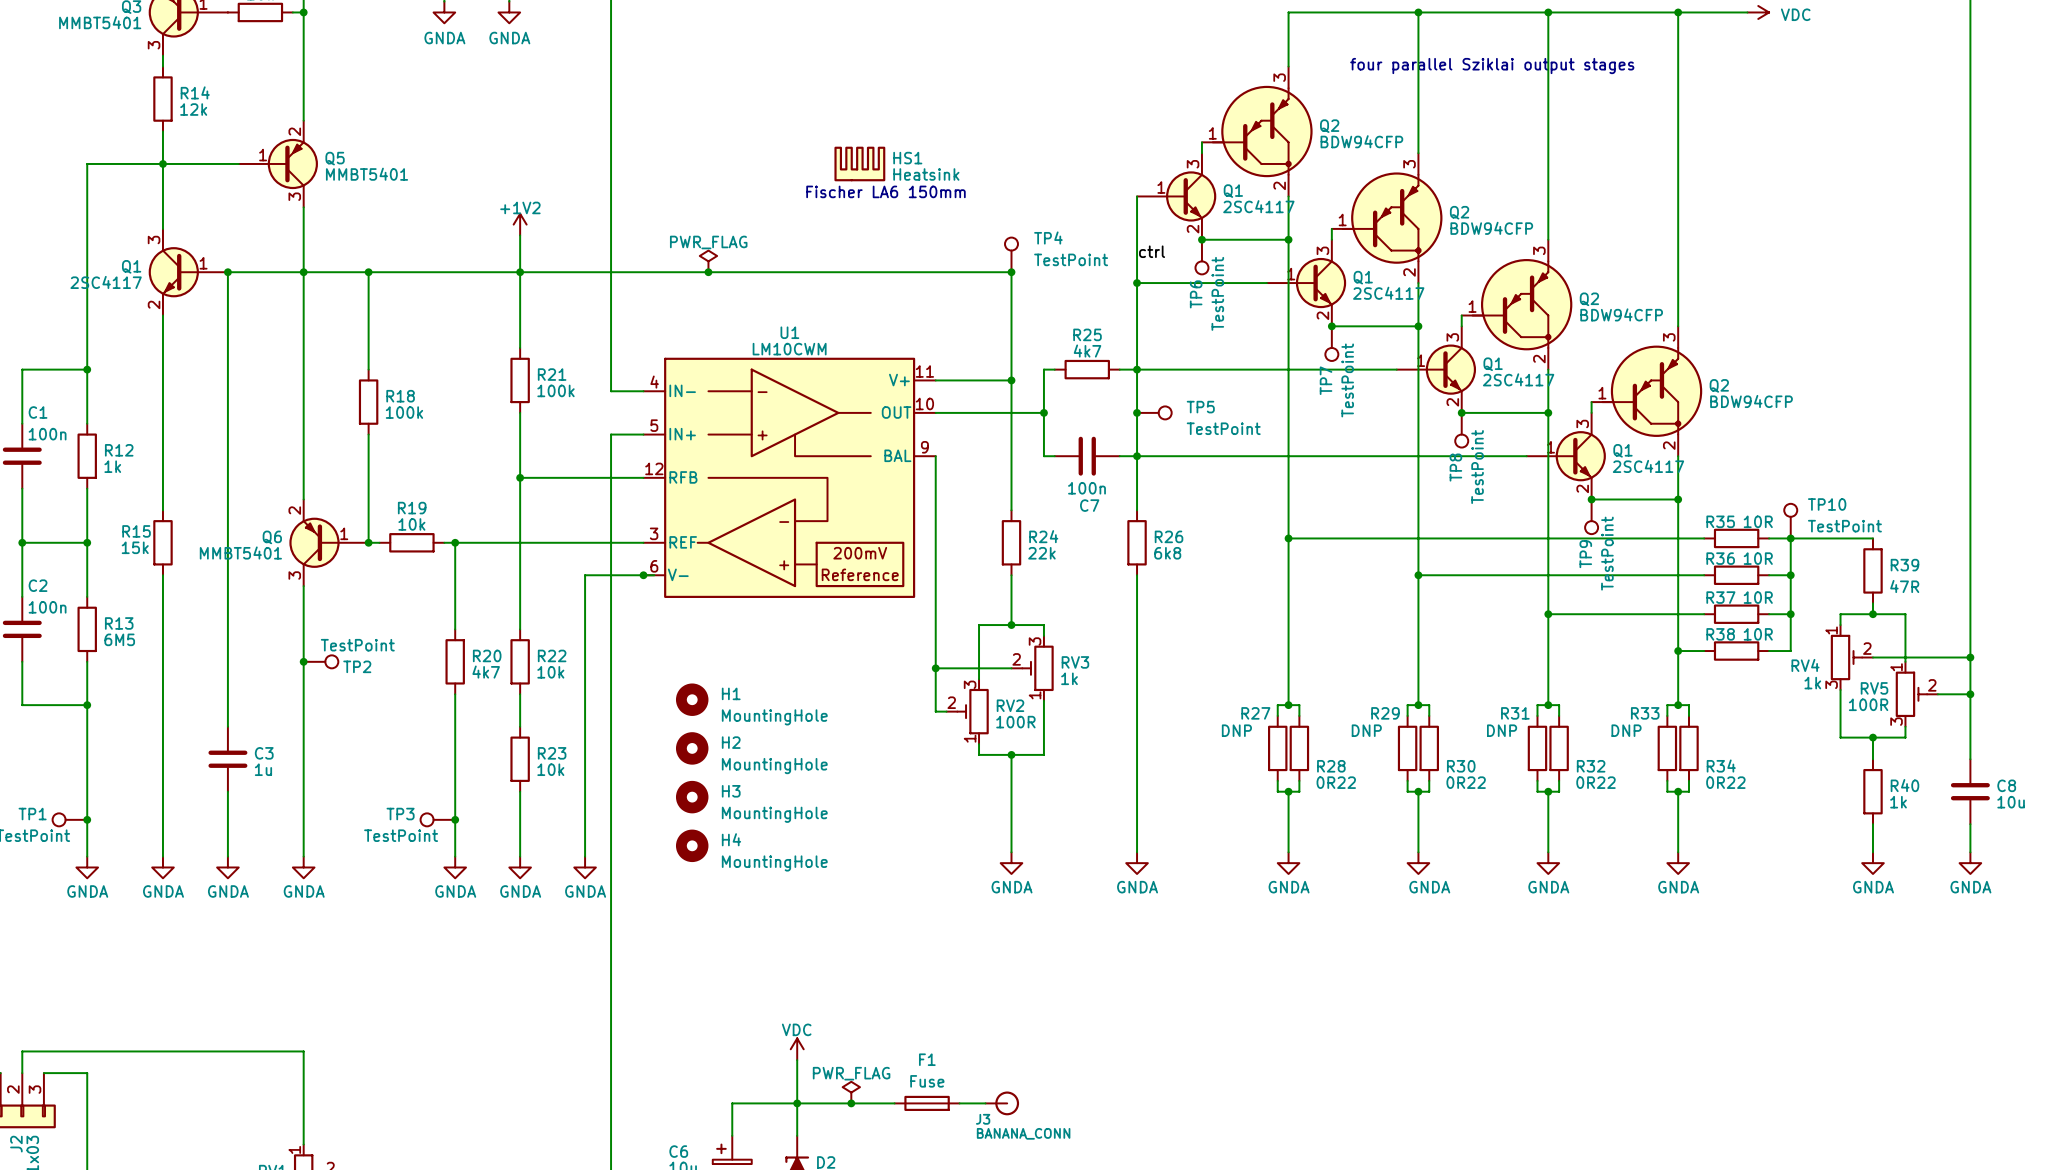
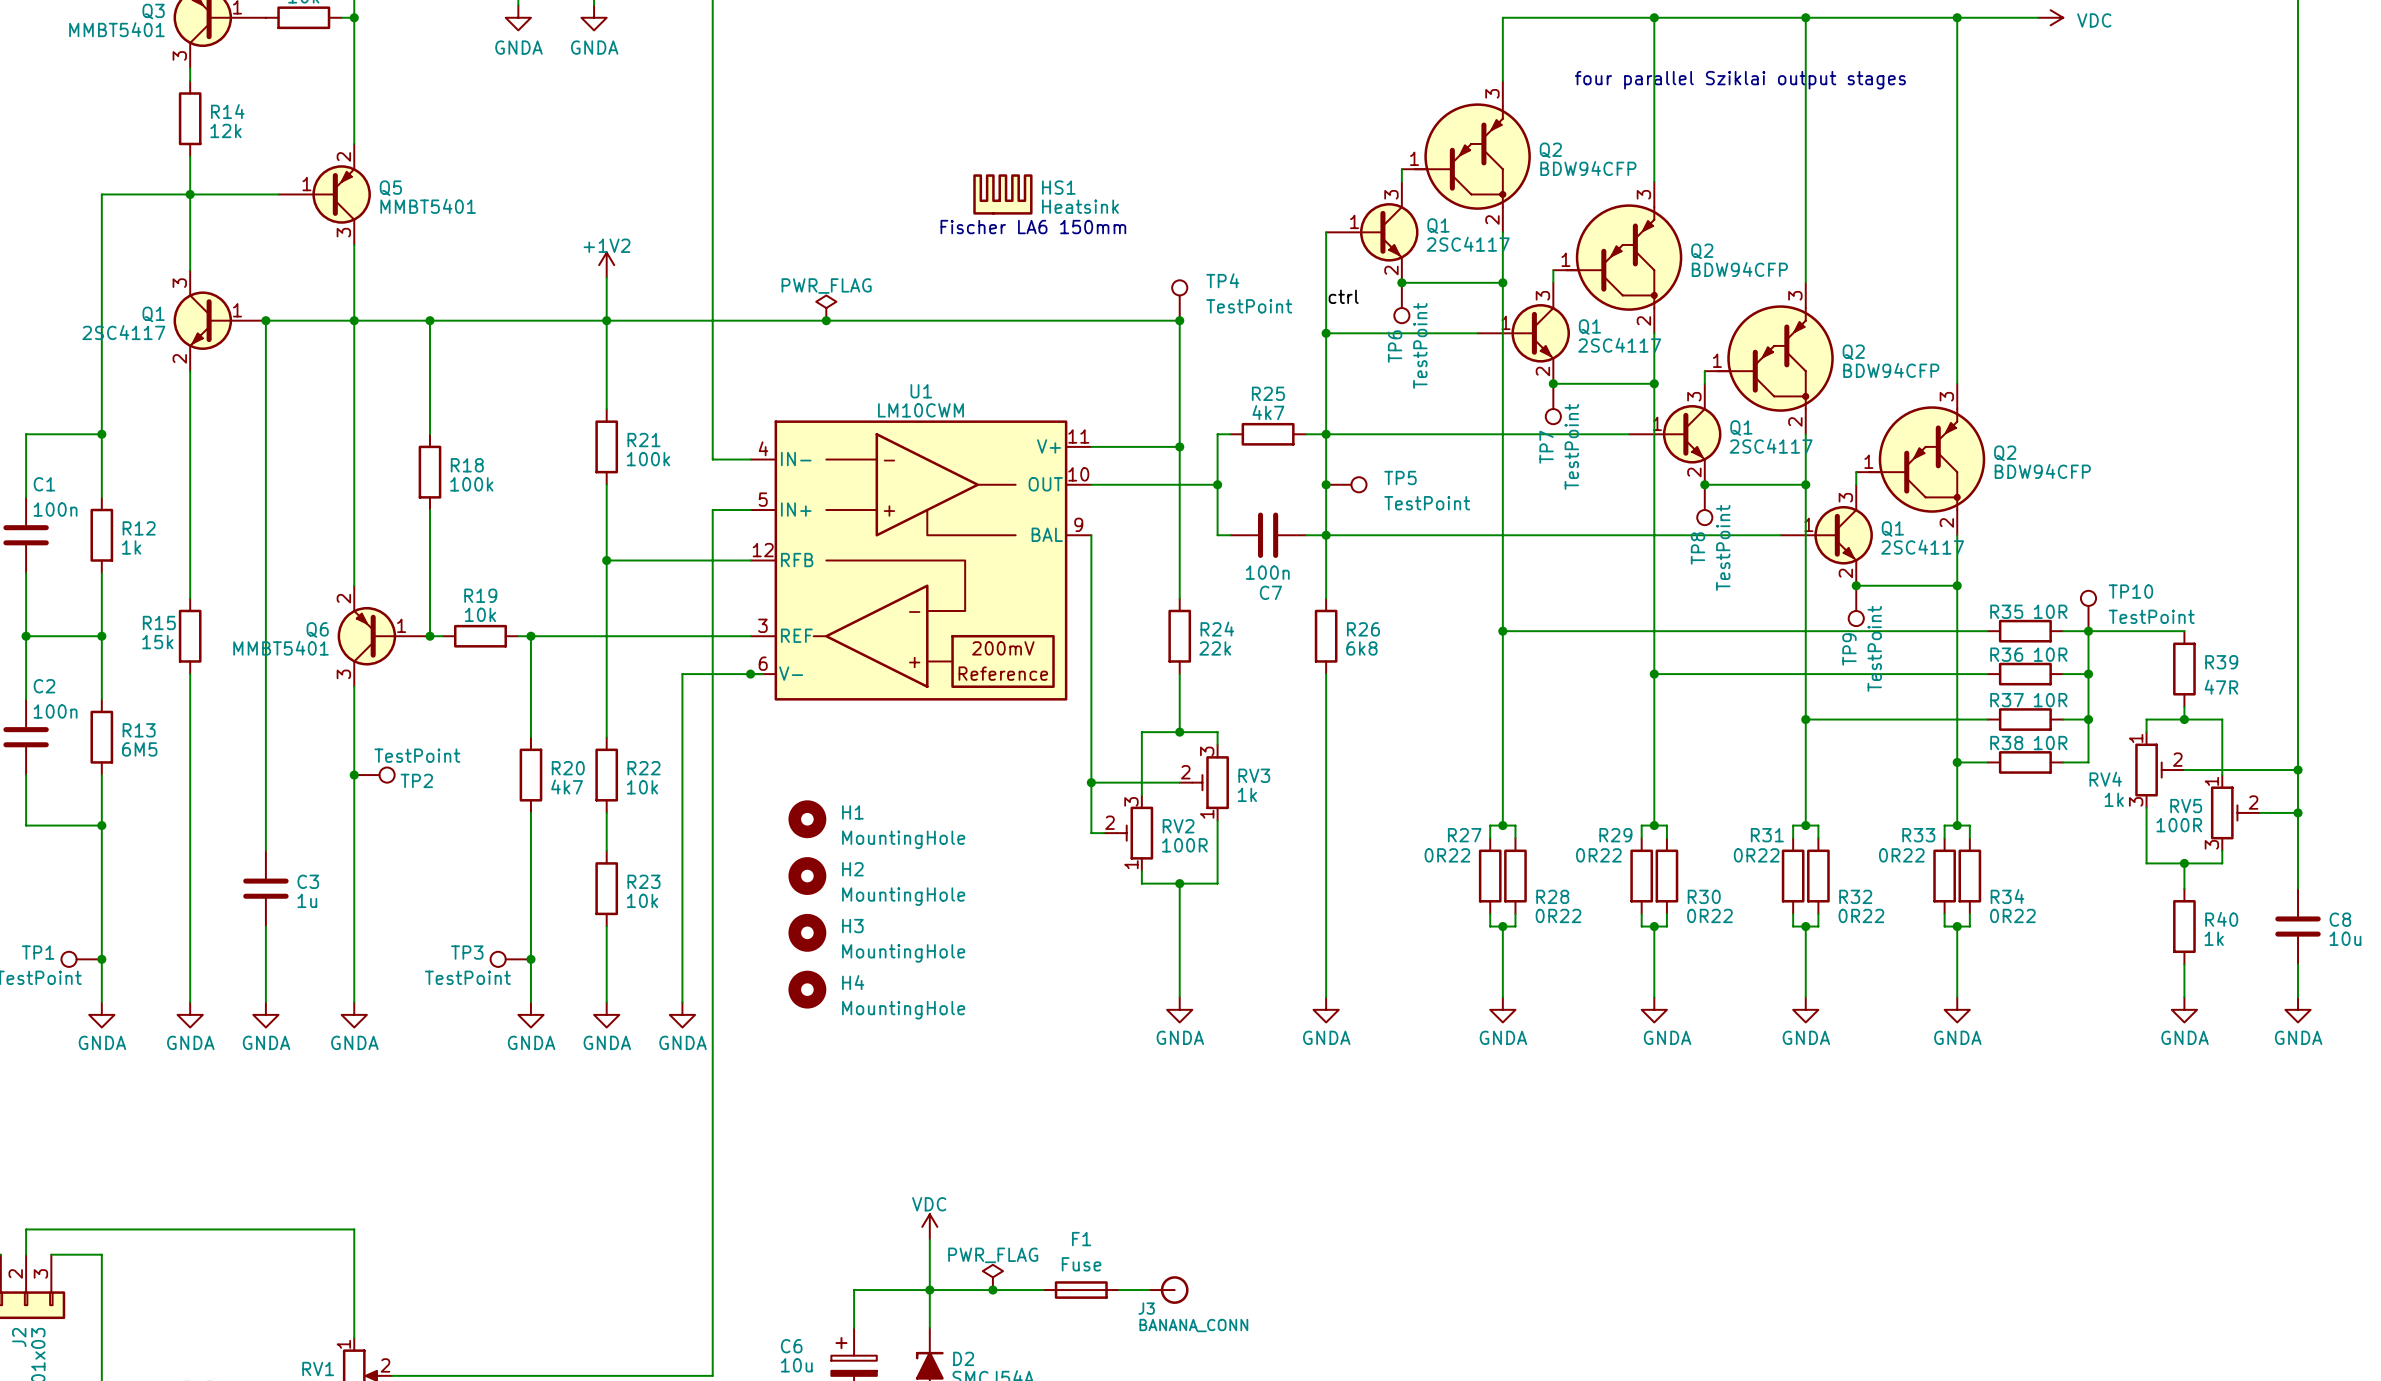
R27 value: DNP (1236, 730) -> 0R22 (1447, 855)
R29 value: DNP (1366, 730) -> 0R22 (1598, 855)
R31 value: DNP (1502, 730) -> 0R22 (1756, 855)
R33 value: DNP (1626, 730) -> 0R22 (1901, 855)

